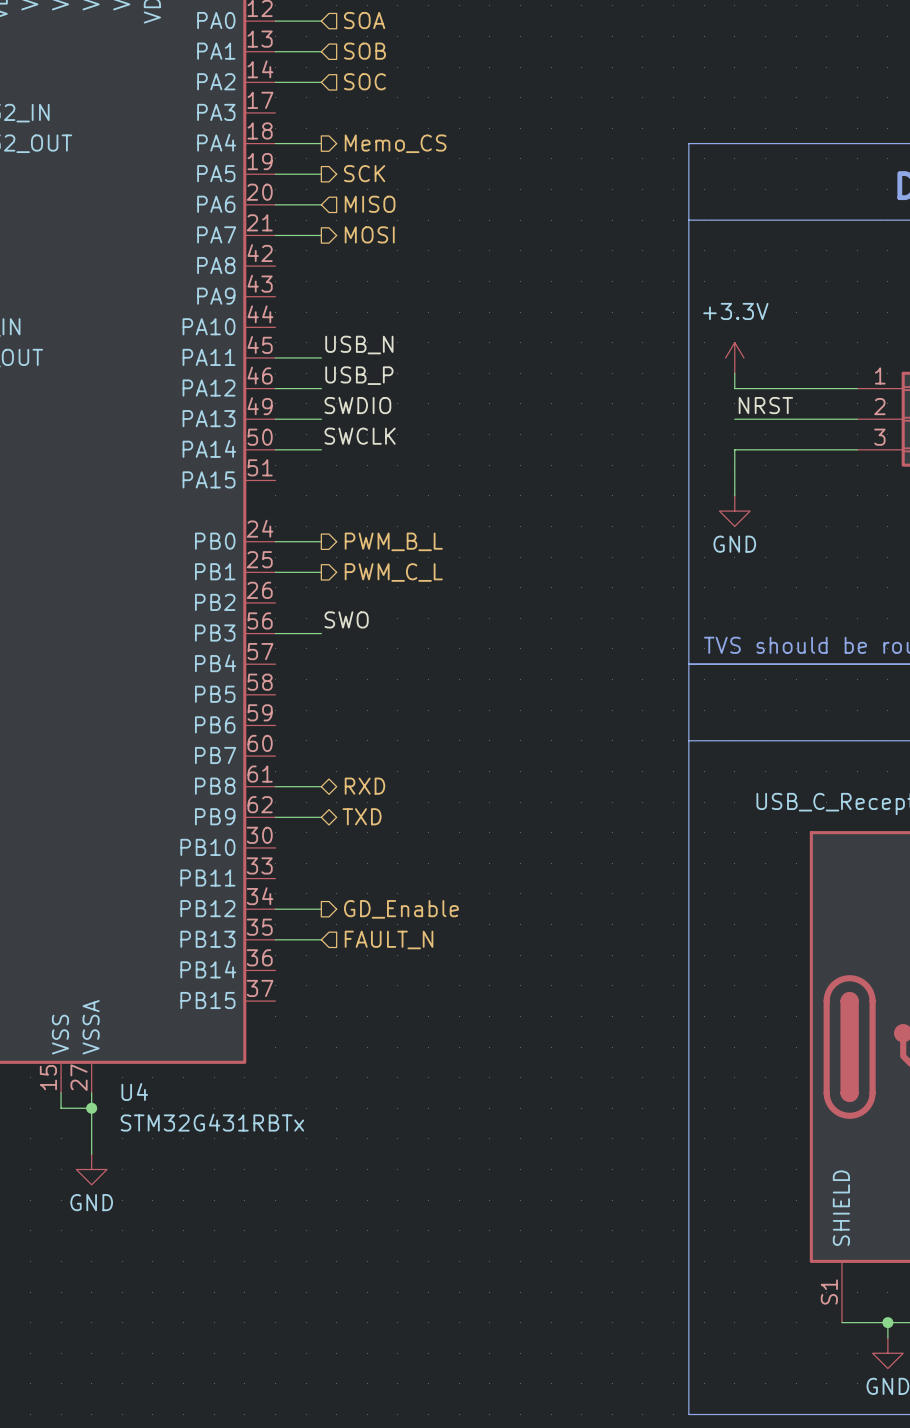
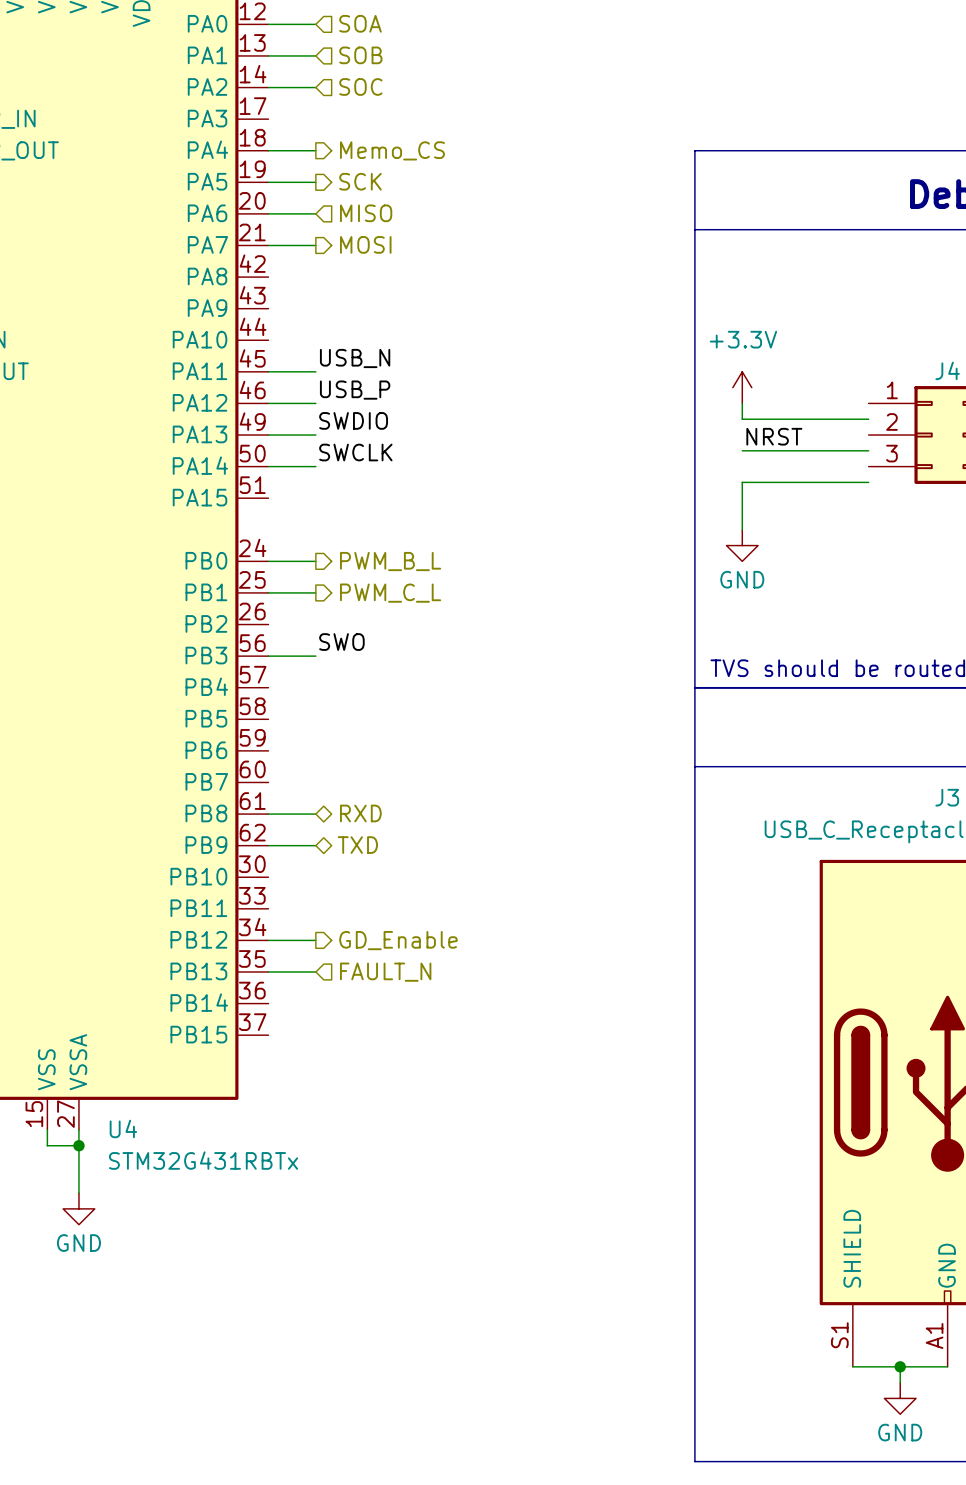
power symbol position: +3.3V (734, 357) -> +3.3V (742, 387)
wire: (734, 373) (734, 388) (857, 388) -> (742, 403) (742, 419) (868, 419)
label position: NRST (765, 405) -> NRST (774, 436)
wire: (734, 419) (857, 419) -> (742, 450) (868, 450)
wire: (857, 449) (734, 449) (734, 465) -> (868, 482) (742, 482)
power symbol position: GND (734, 511) -> GND (742, 545)

